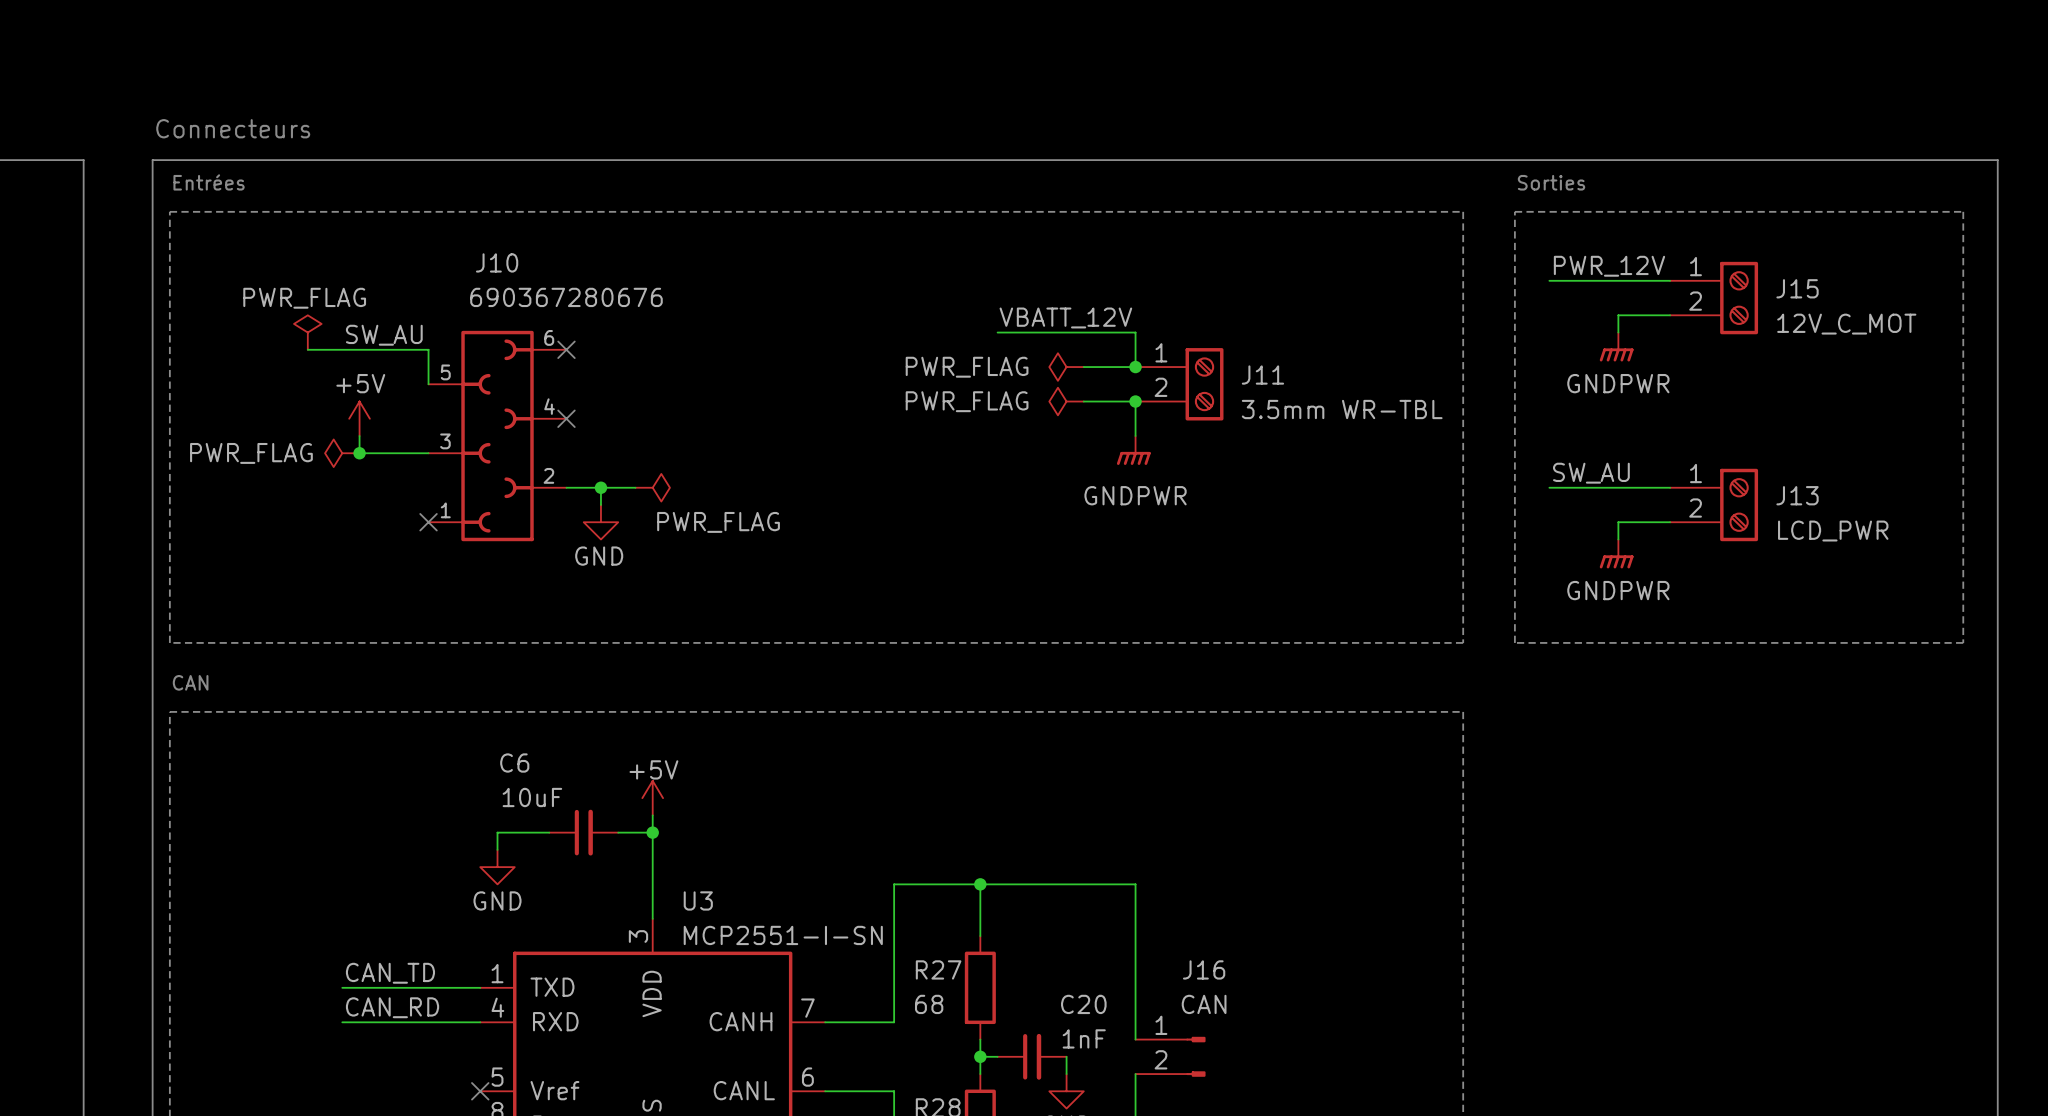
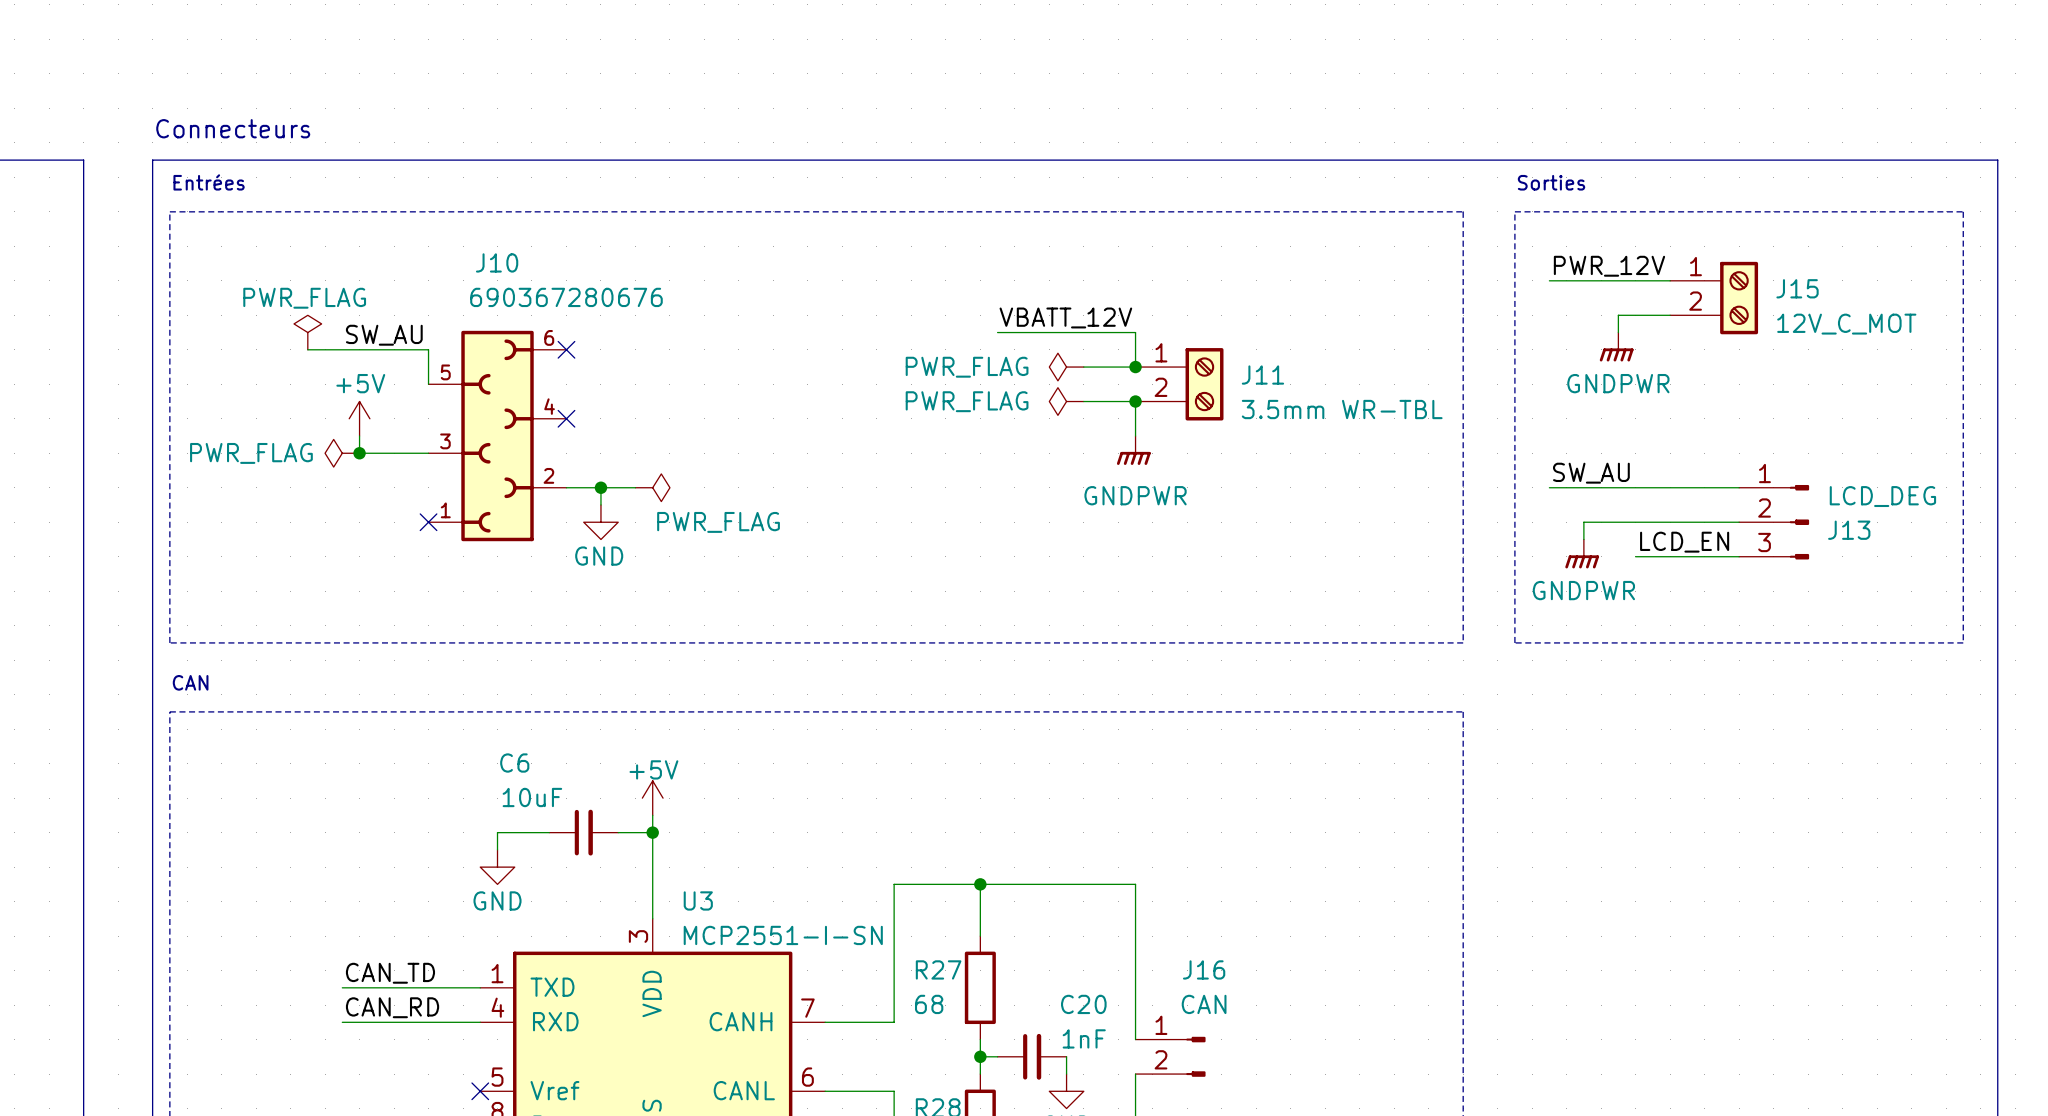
J13 symbol: [1670, 468, 1759, 542] -> [1739, 484, 1810, 560]
wire: (1618, 522) (1618, 539) -> (1618, 522) (1583, 522) (1583, 539)
J13 value: LCD_PWR (1833, 531) -> LCD_DEG (1882, 496)
label: none -> LCD_EN (1684, 542)
power symbol position: GNDPWR (1616, 553) -> GNDPWR (1582, 553)
wire: none -> (1635, 556) (1739, 556)

